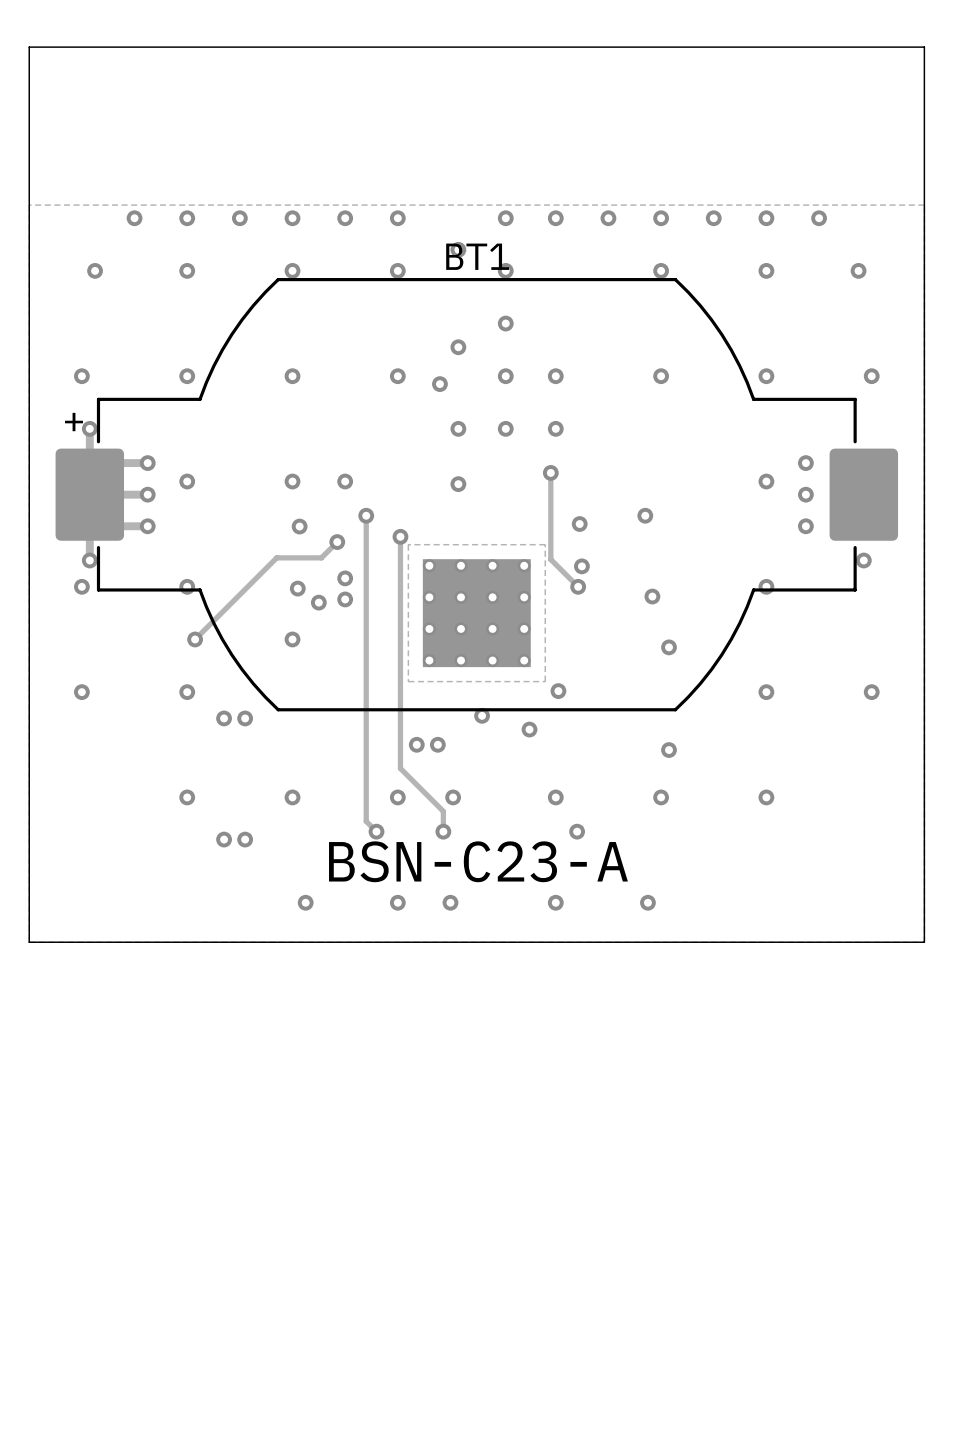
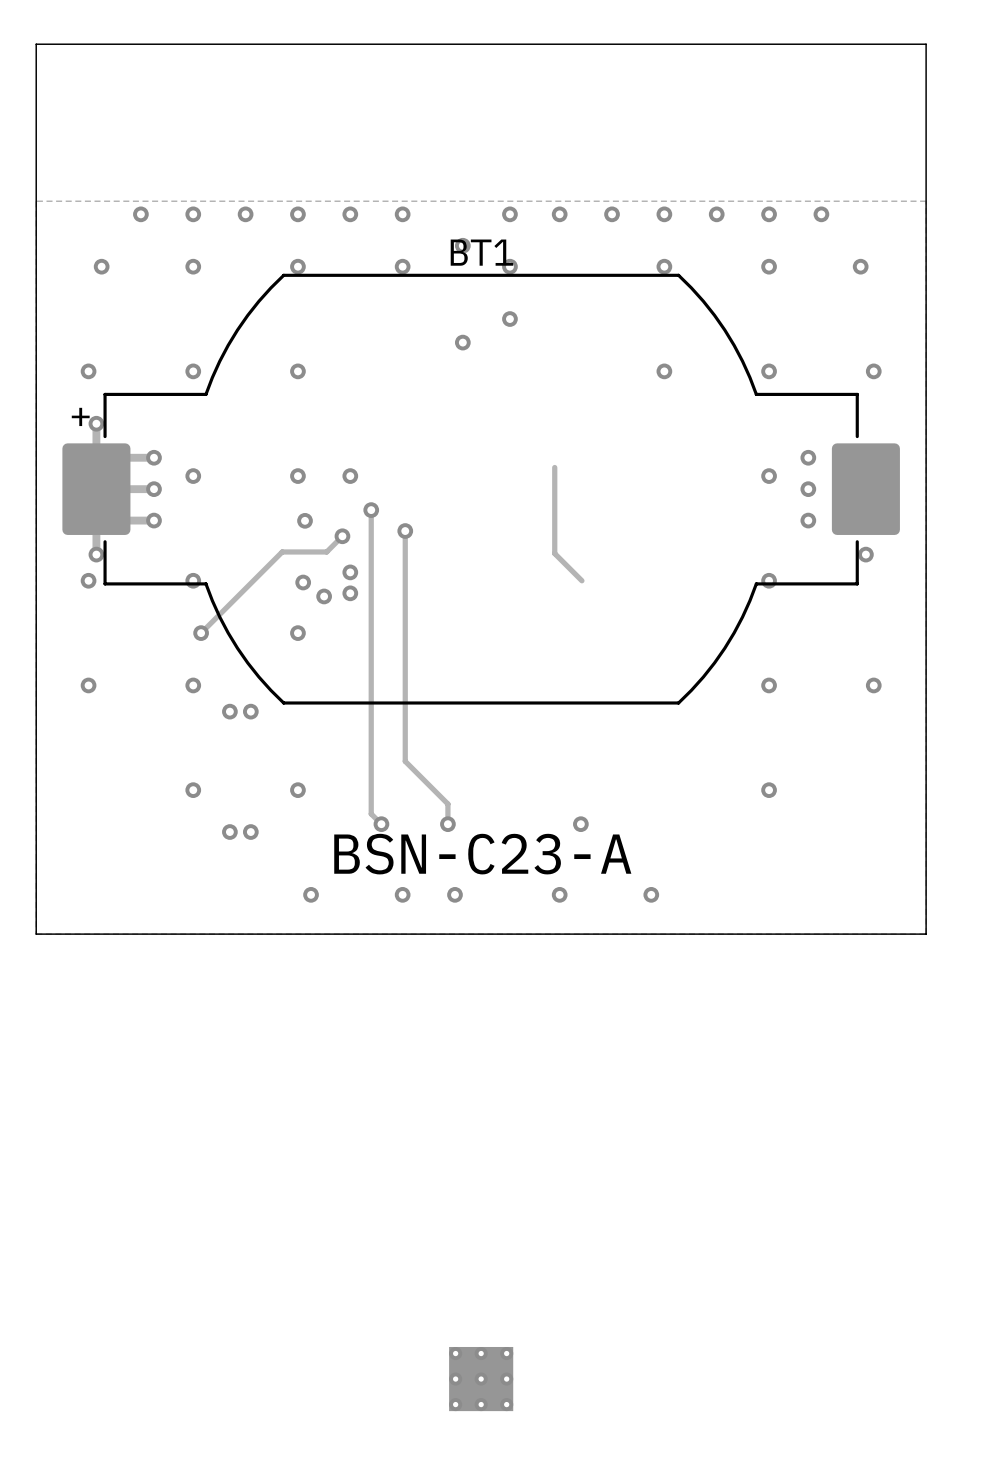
via: (397, 376) -> none
via: (505, 376) -> none
via: (555, 376) -> none
via: (439, 384) -> none
via: (458, 428) -> none
via: (505, 428) -> none
via: (555, 428) -> none
via: (550, 472) -> none
via: (458, 484) -> none
via: (645, 515) -> none
via: (579, 524) -> none
zone outline: (545, 544) (408, 544) (408, 681) (545, 681) (545, 544) -> none
via: (581, 566) -> none
via: (578, 586) -> none
via: (652, 596) -> none
part: (476, 613) -> none
via: (669, 647) -> none
via: (558, 691) -> none
via: (482, 715) -> none
via: (529, 729) -> none
via: (416, 744) -> none
via: (437, 744) -> none
via: (669, 750) -> none
via: (397, 797) -> none
via: (453, 797) -> none
via: (555, 797) -> none
via: (661, 797) -> none
part: none -> (481, 1379)

